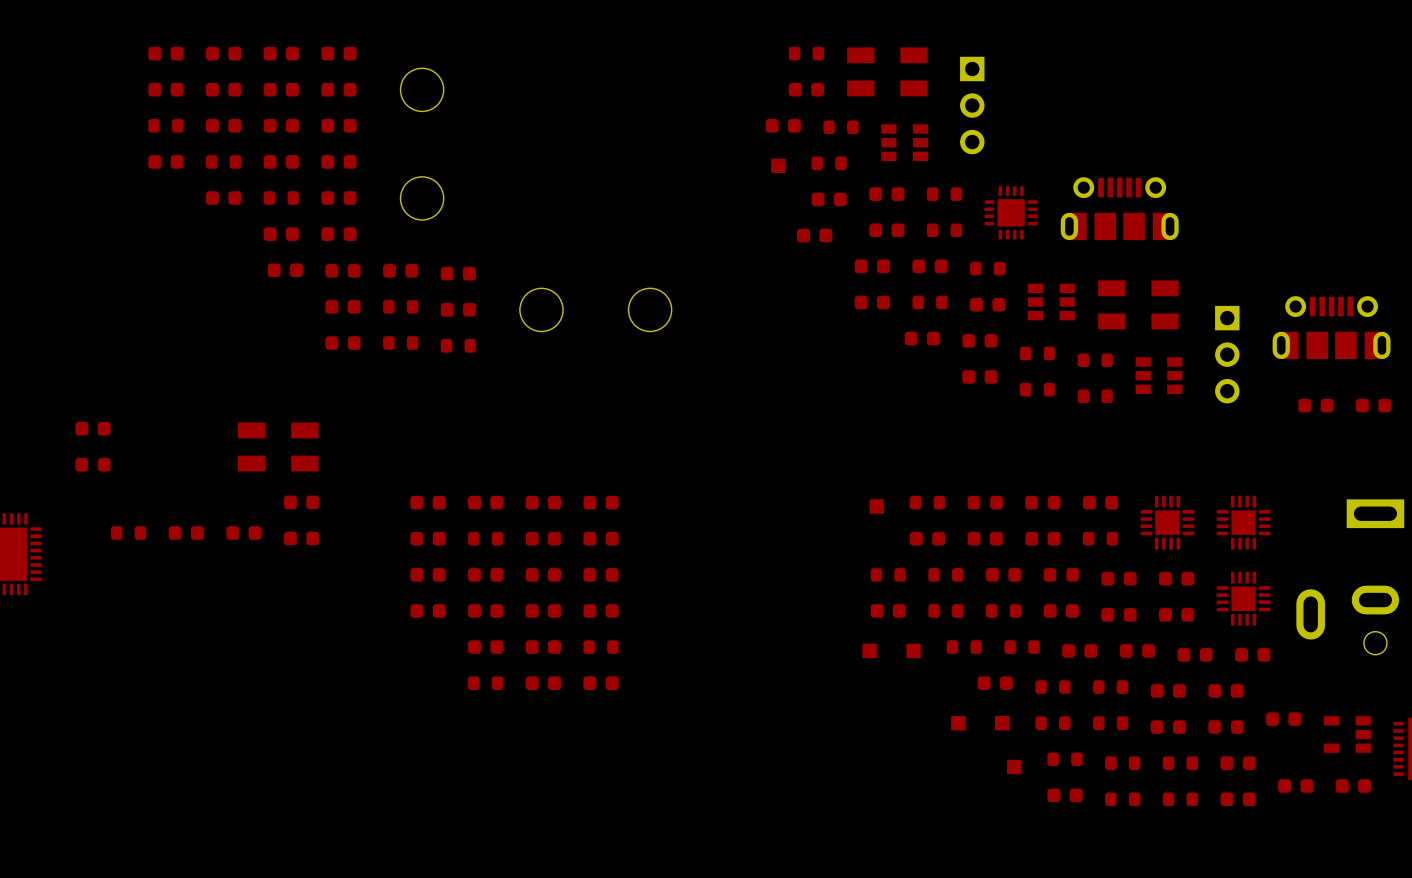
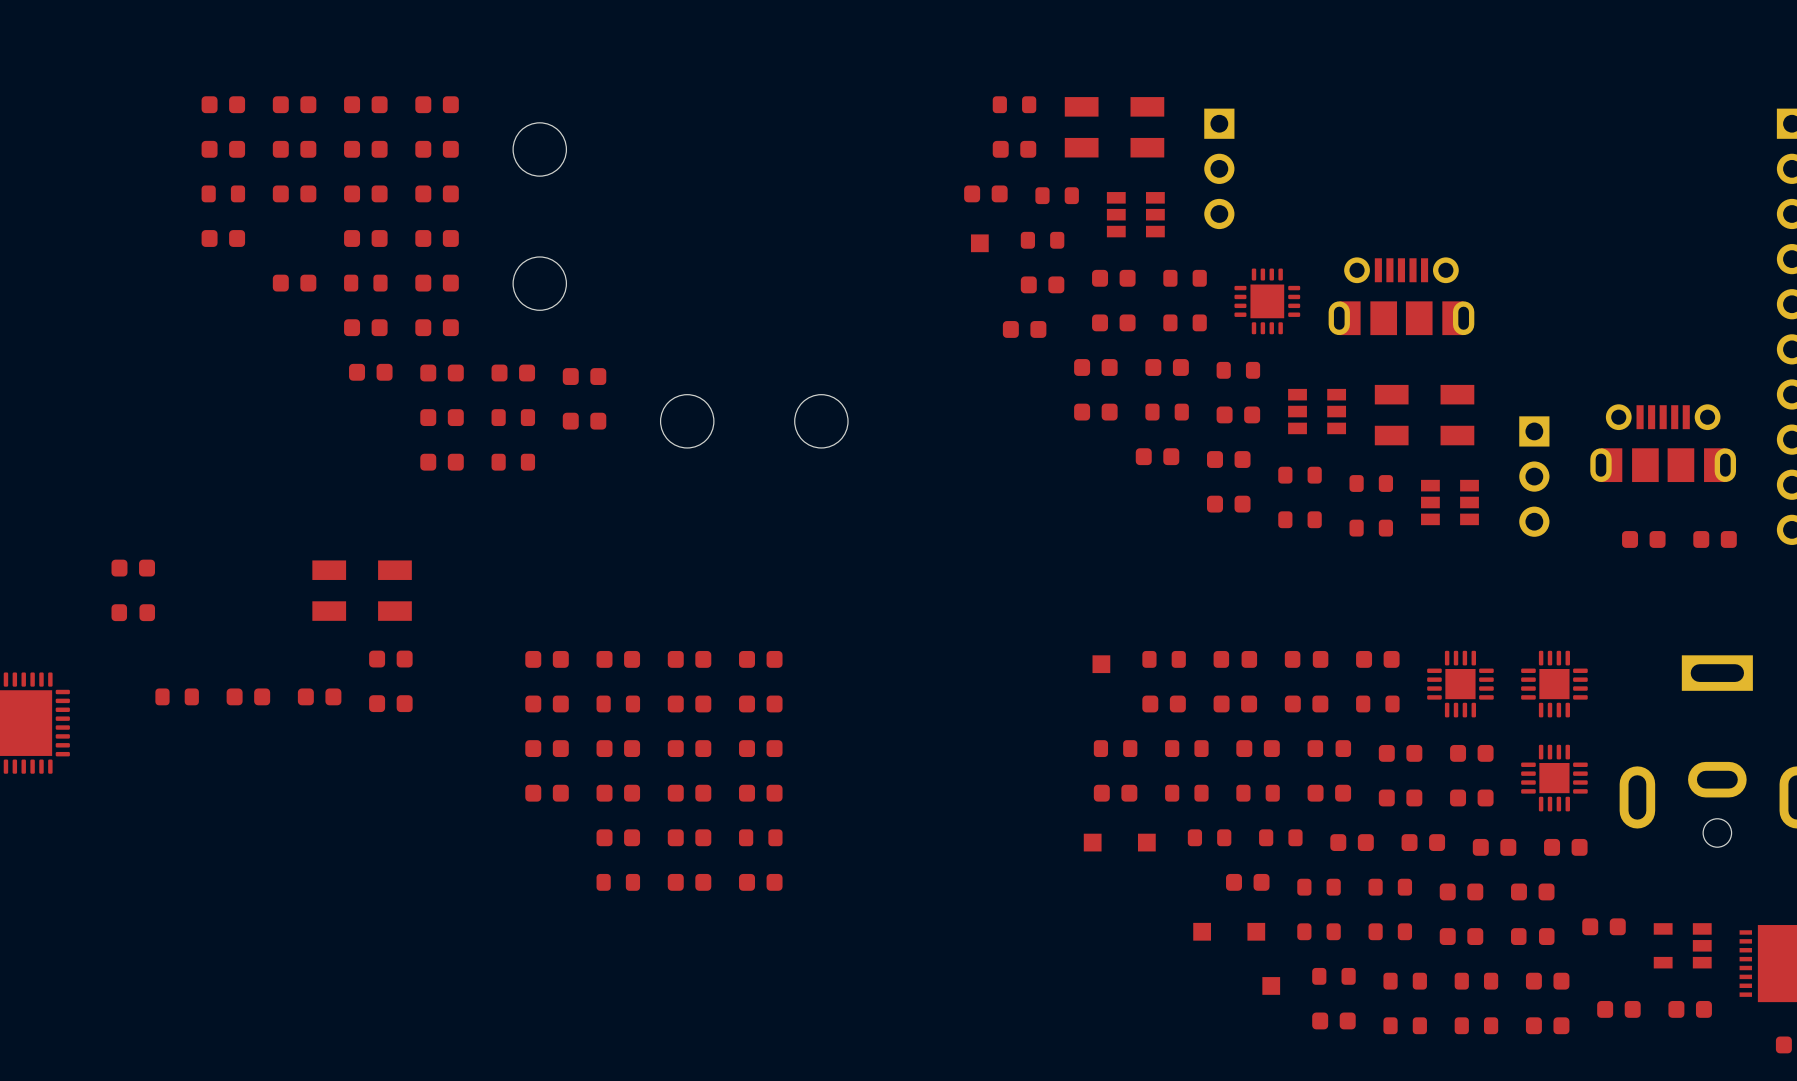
part: (223, 161) -> none
part: (458, 345) -> none

